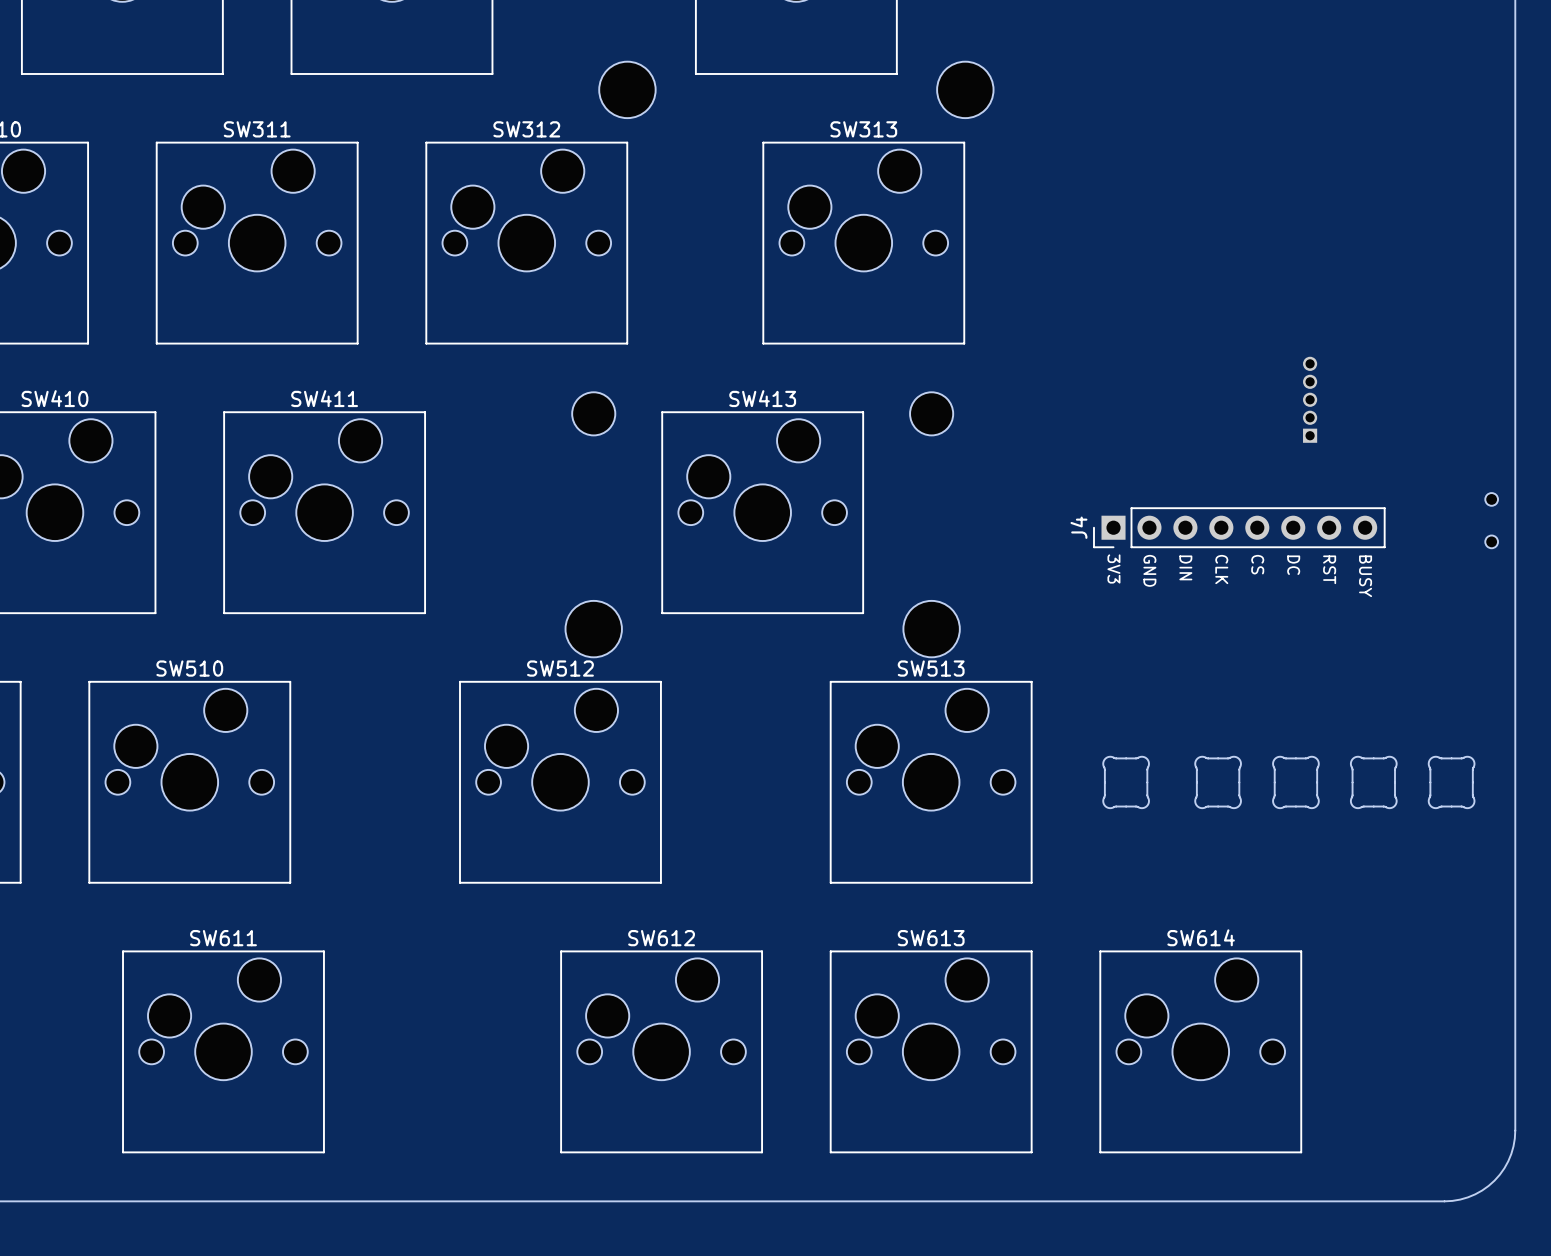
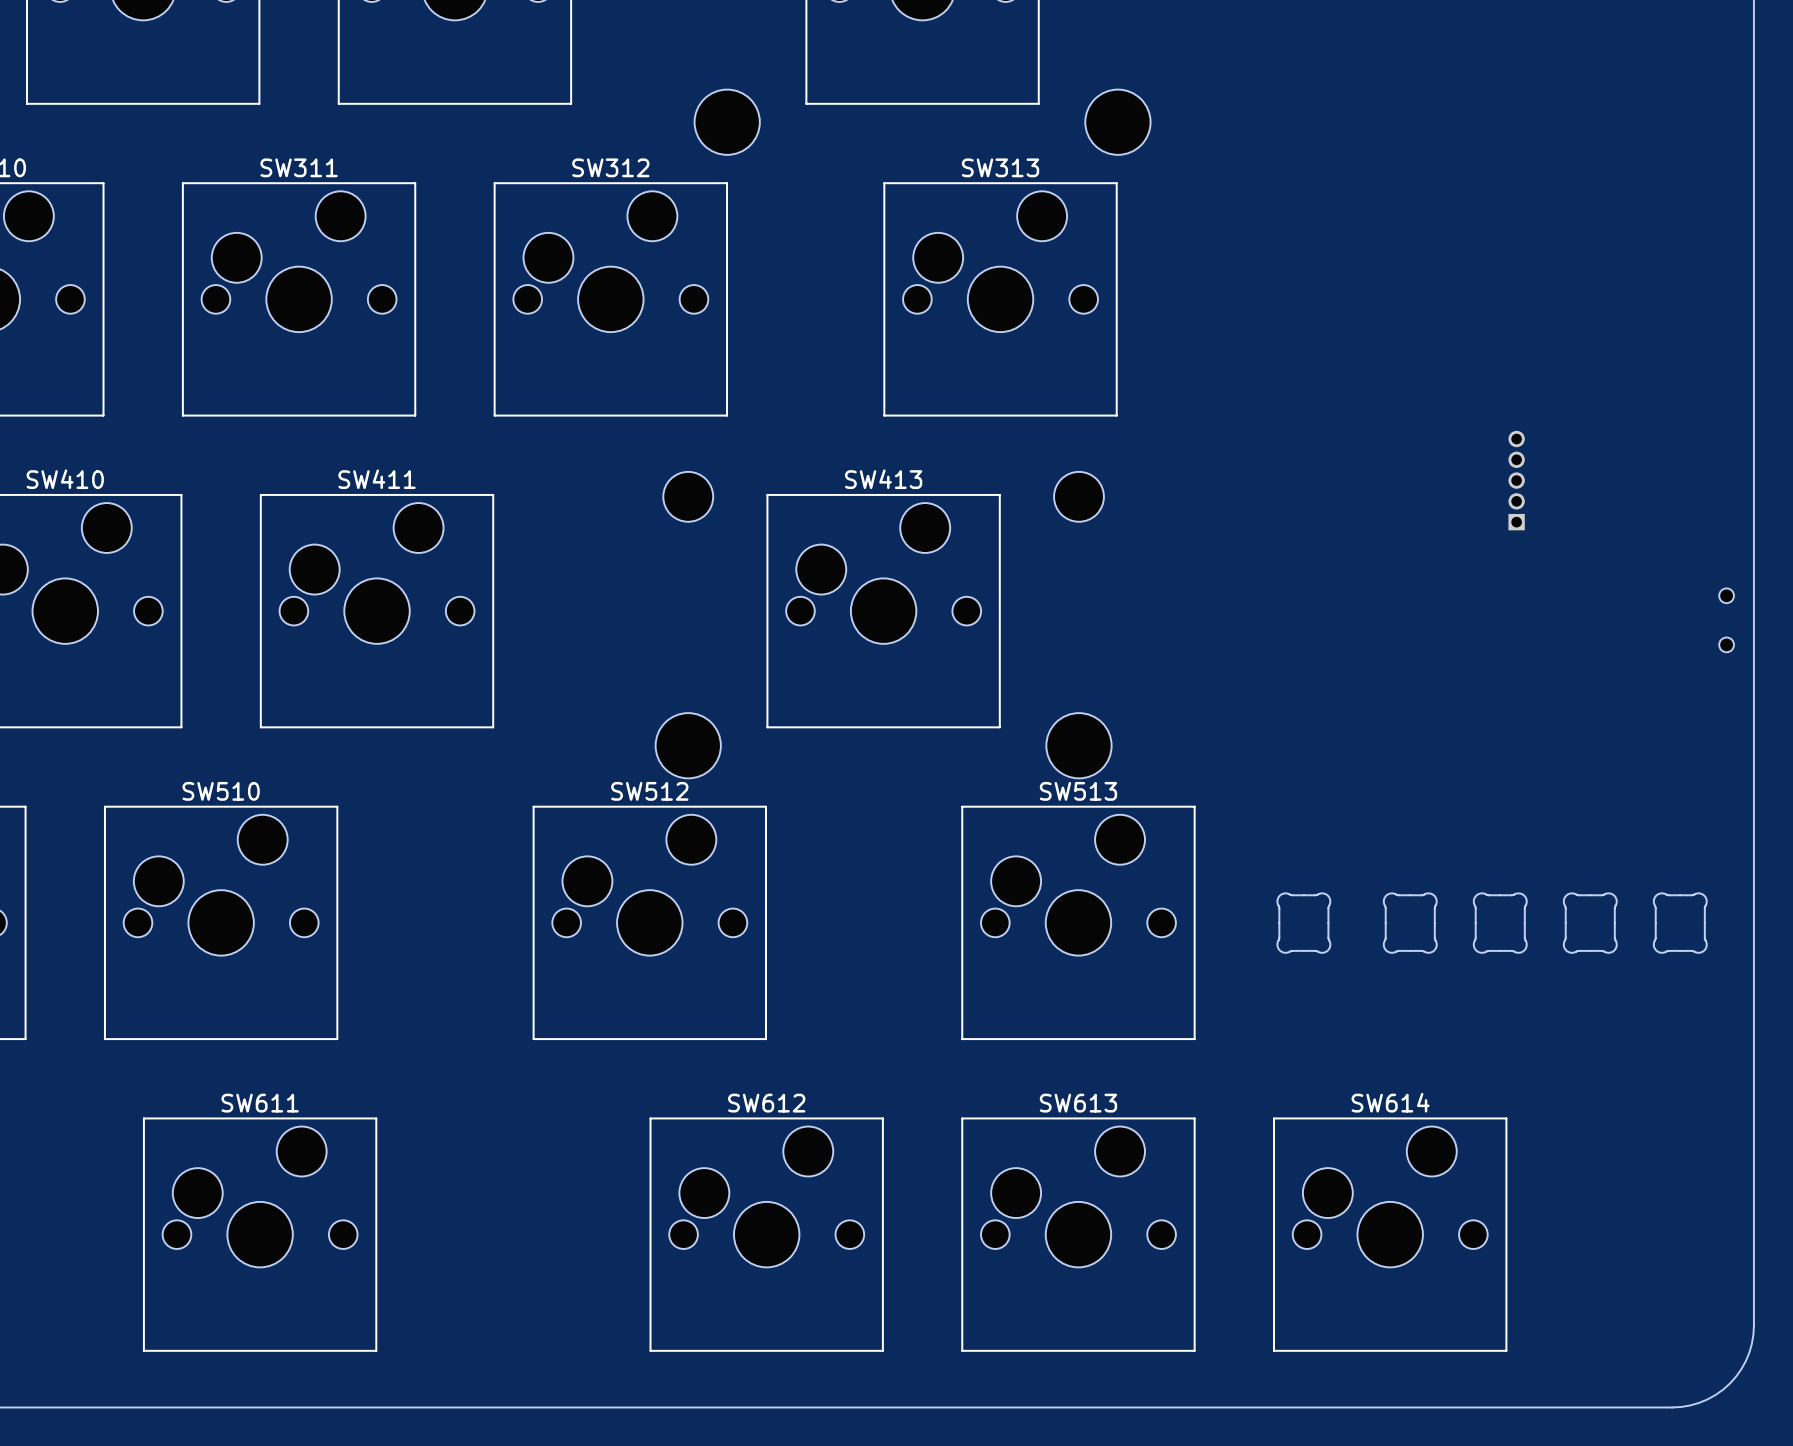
J4: (1239, 527) -> none
text: CS (1257, 564) -> none
text: DC (1293, 565) -> none
text: DIN (1185, 567) -> none
text: 3V3 (1113, 568) -> none
text: CLK (1221, 569) -> none
text: RST (1329, 569) -> none
text: GND (1149, 570) -> none
text: BUSY (1365, 576) -> none

